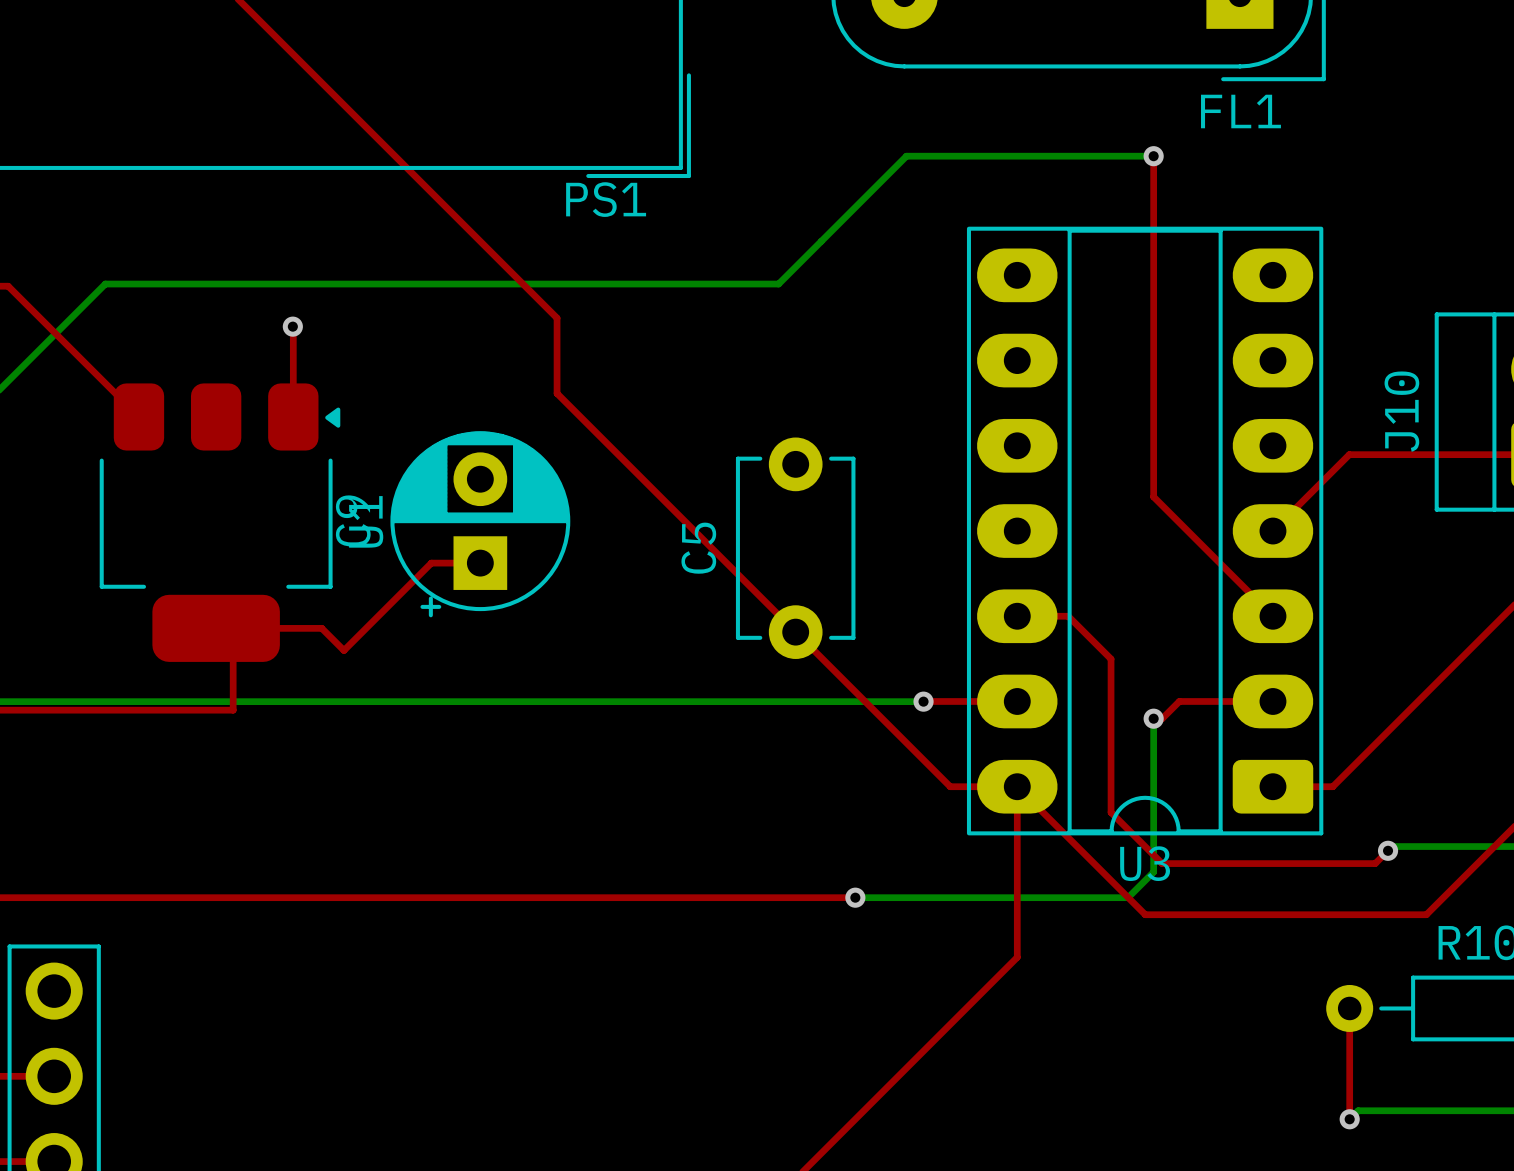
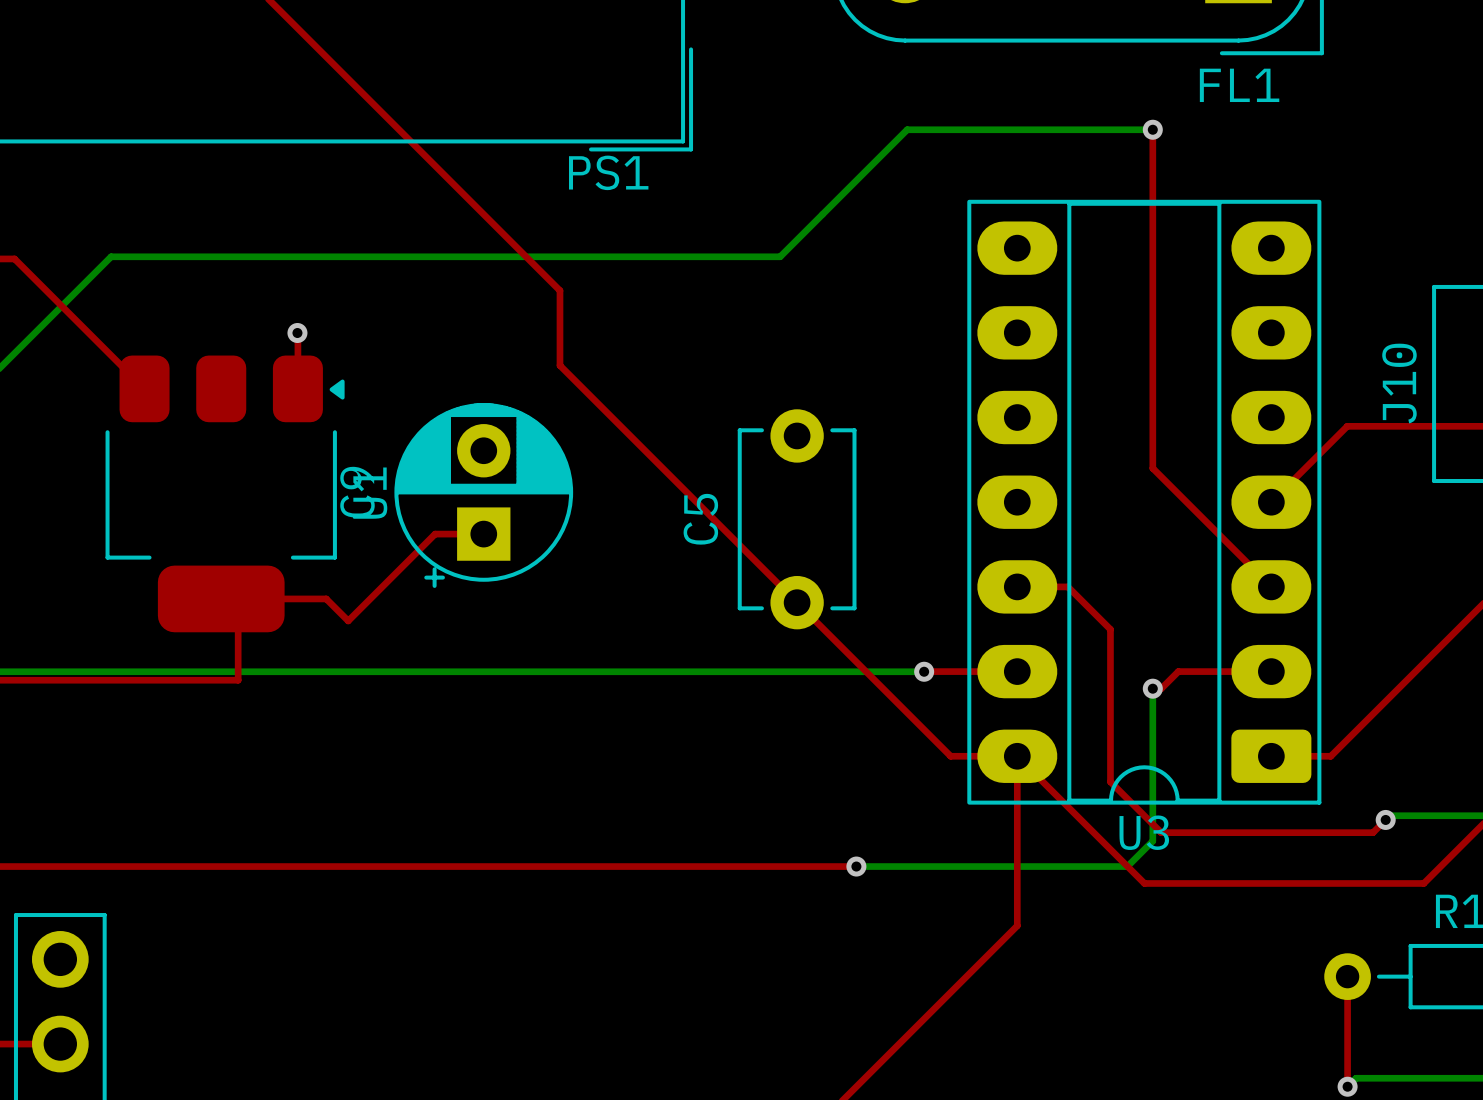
via position: (292, 326) -> (297, 333)
top track: (293, 327) (293, 361) -> none

